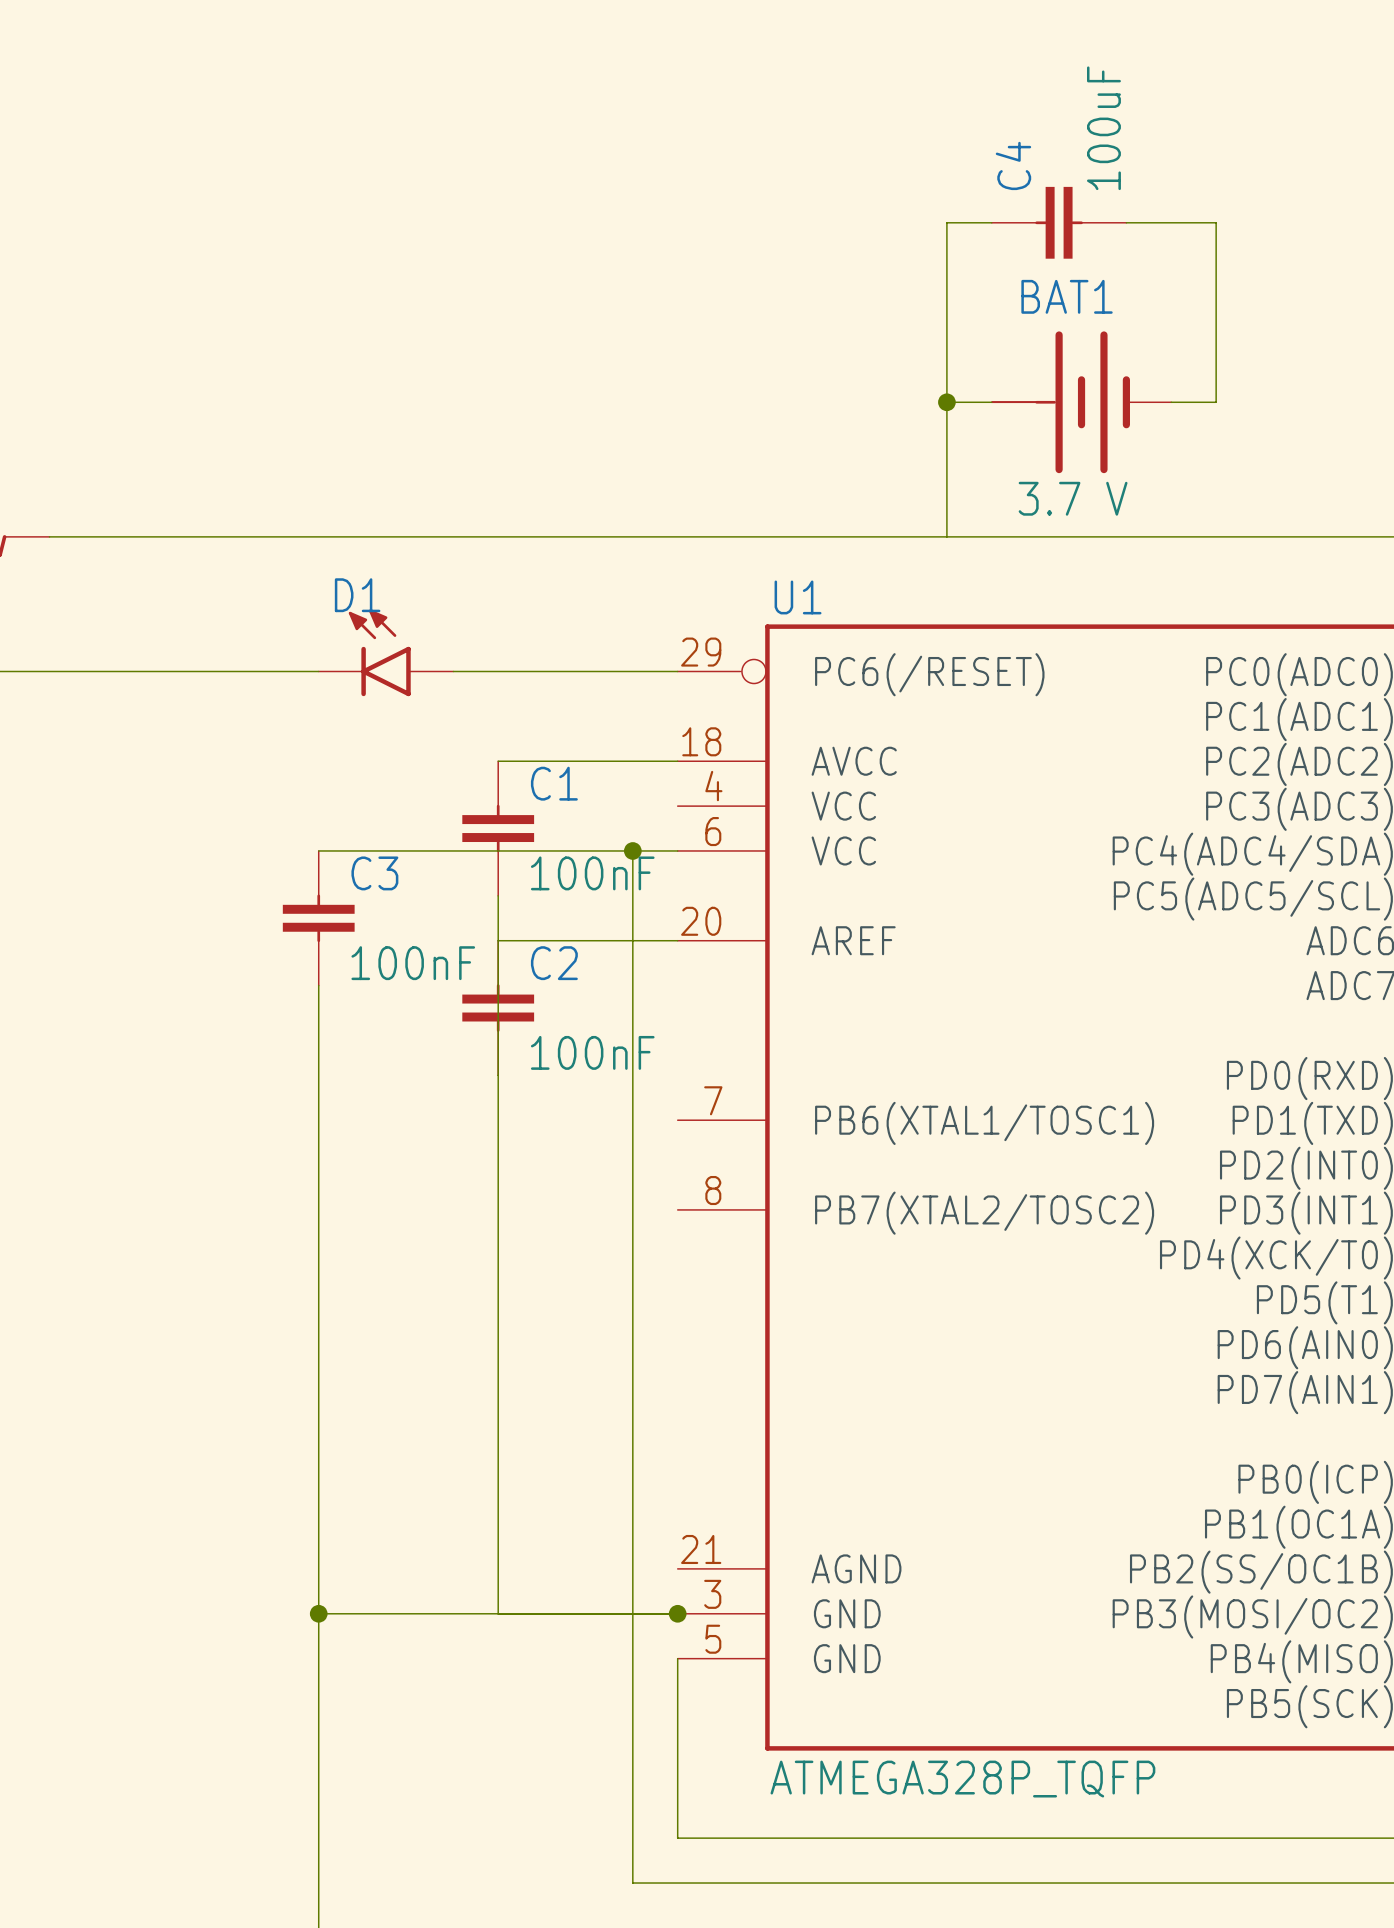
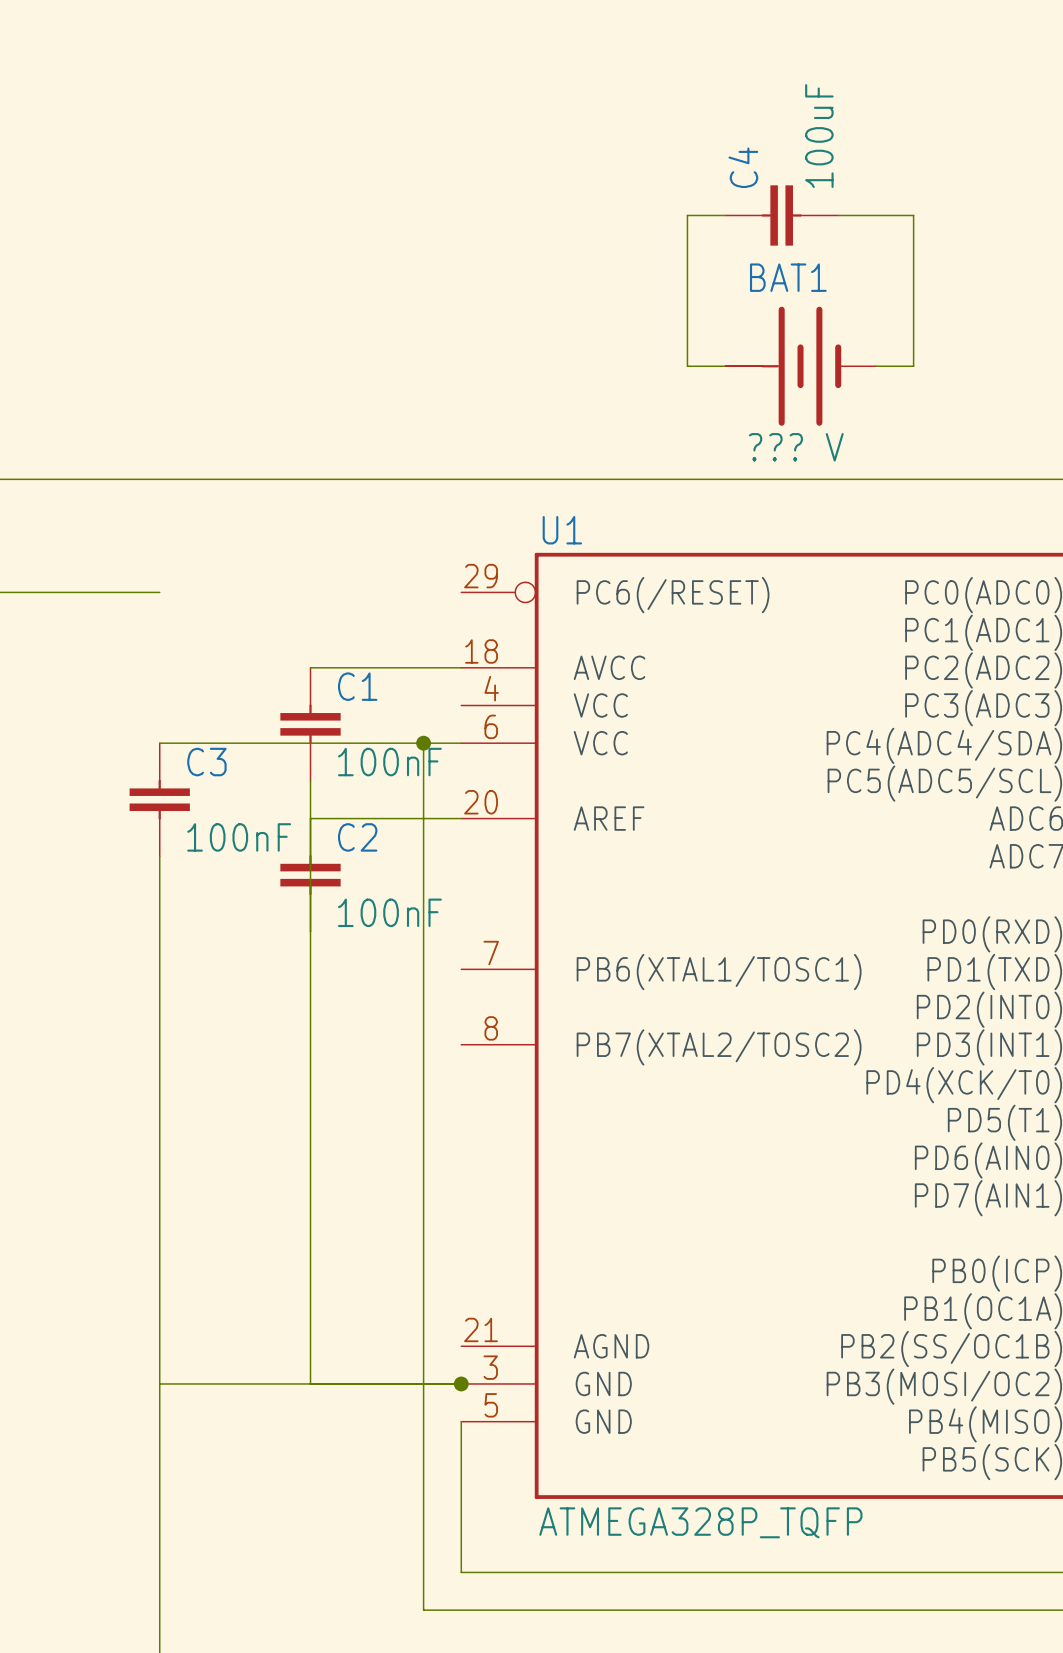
wire: (946, 402) (946, 536) -> none
junction: (946, 402) -> none
BAT1 value: 3.7 V (1073, 498) -> ??? V (796, 447)
D1: (386, 652) -> none
wire: (453, 671) (677, 671) -> none
junction: (318, 1613) -> none

